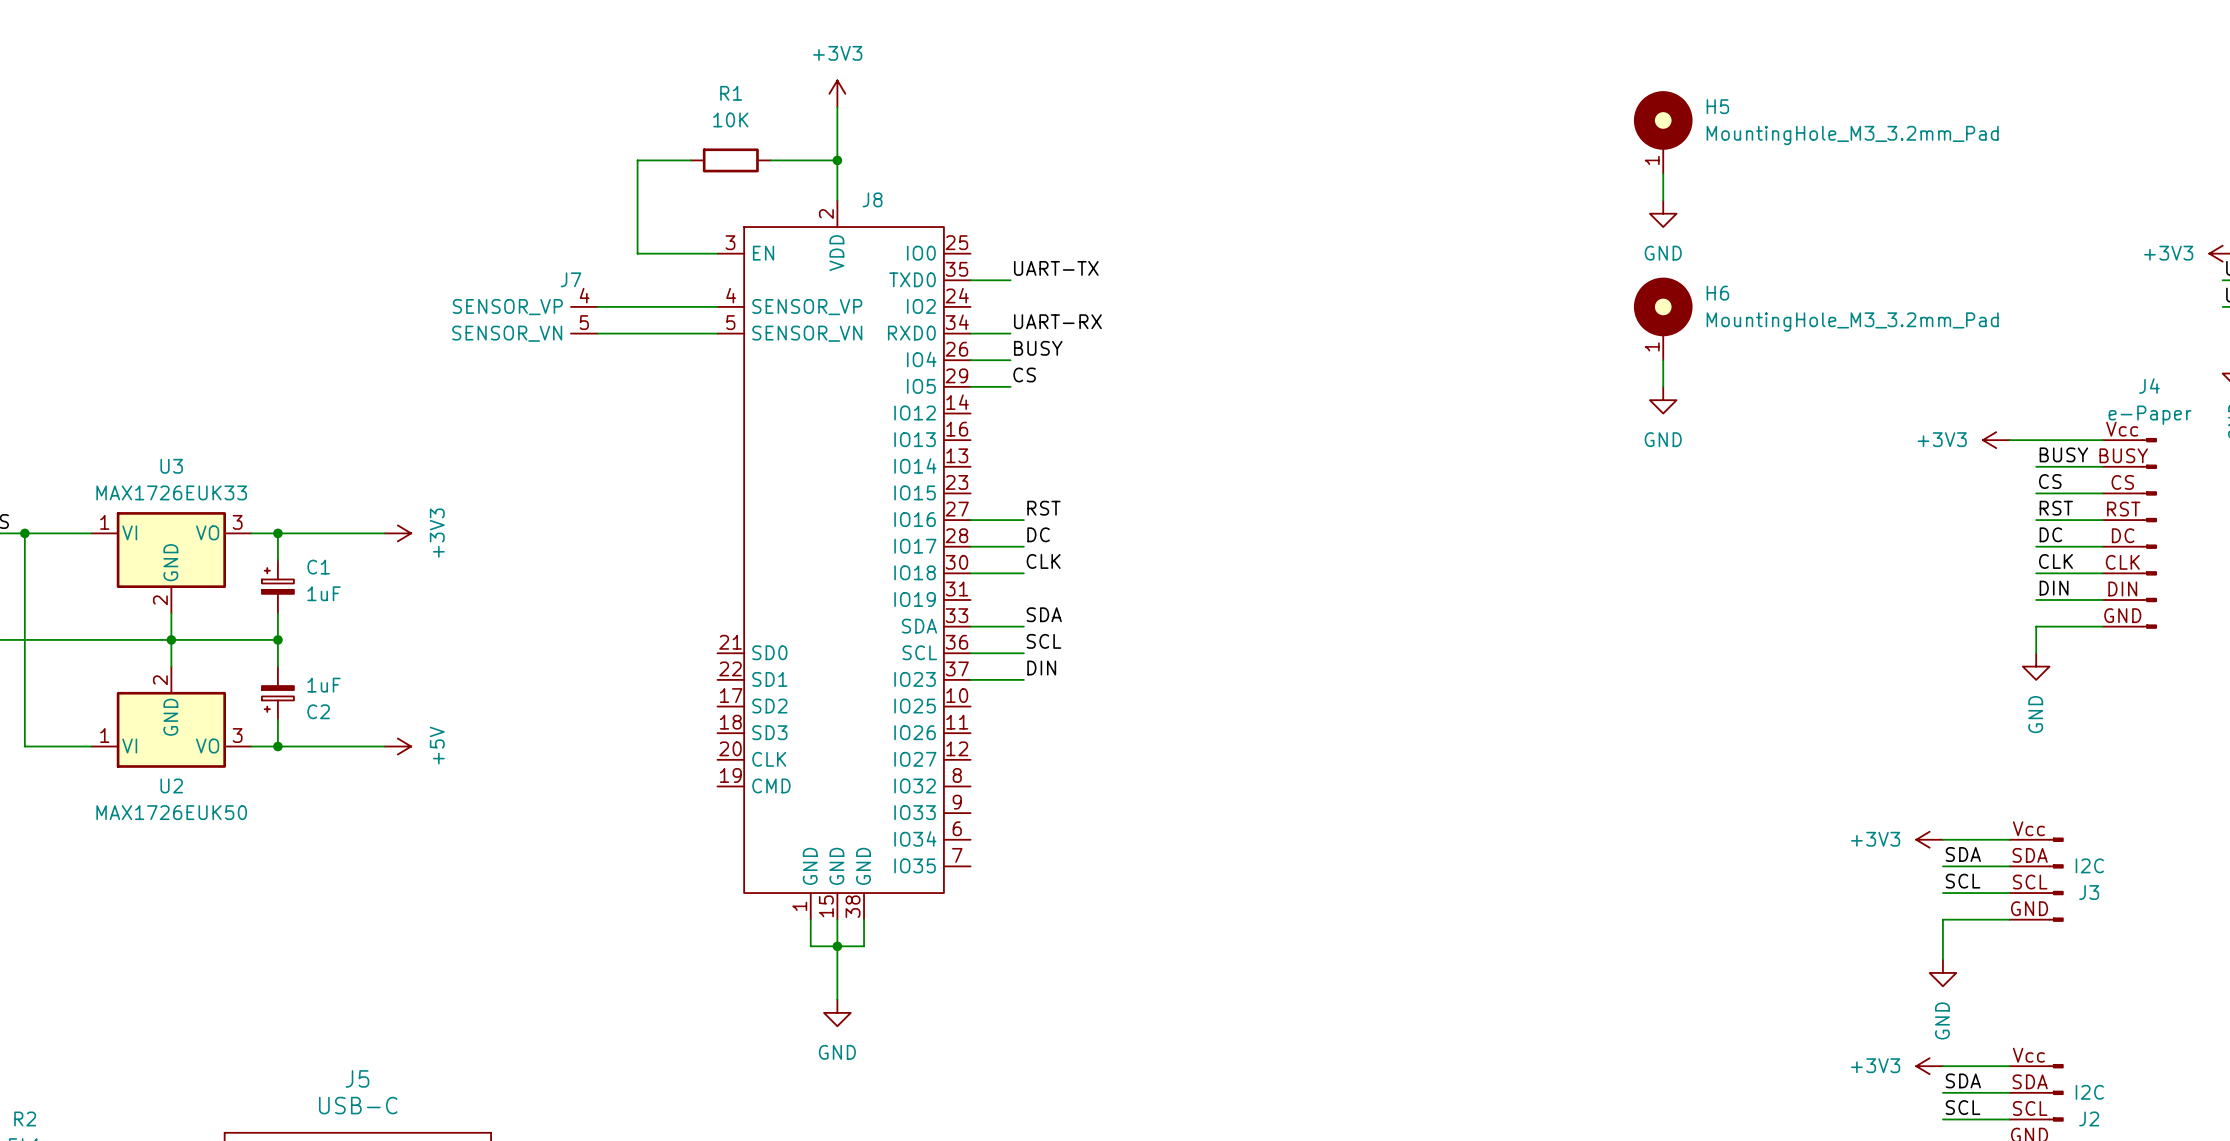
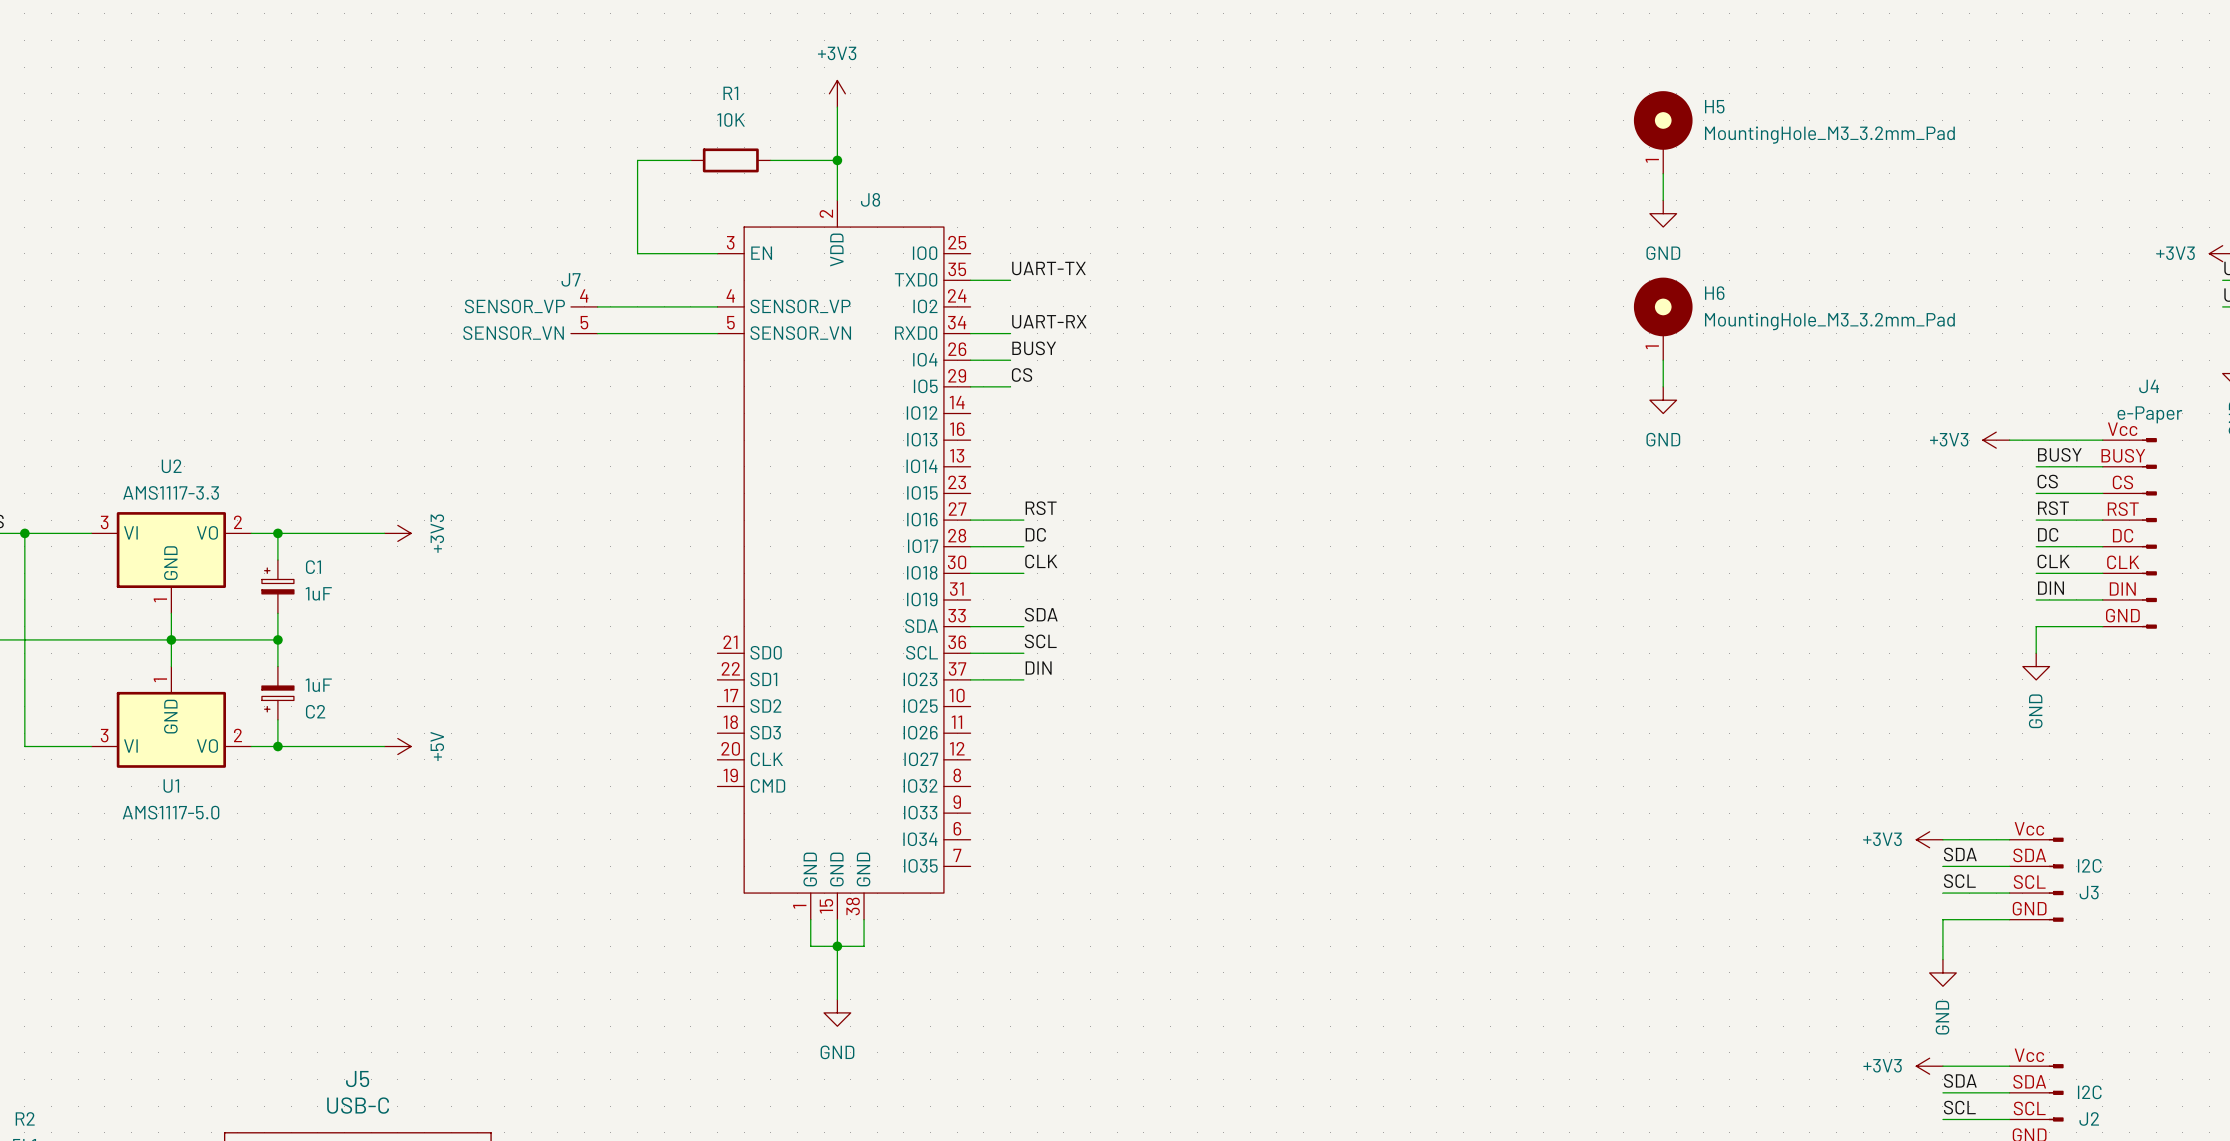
U3: MAX1726EUK33 (171, 562) -> none
U2 symbol: [91, 666, 252, 768] -> [91, 512, 252, 614]
U1: none -> AMS1117-5.0 (171, 717)
U2 name position: U2 (171, 785) -> U2 (171, 466)
U2 value: MAX1726EUK50 (171, 812) -> AMS1117-3.3 (171, 492)

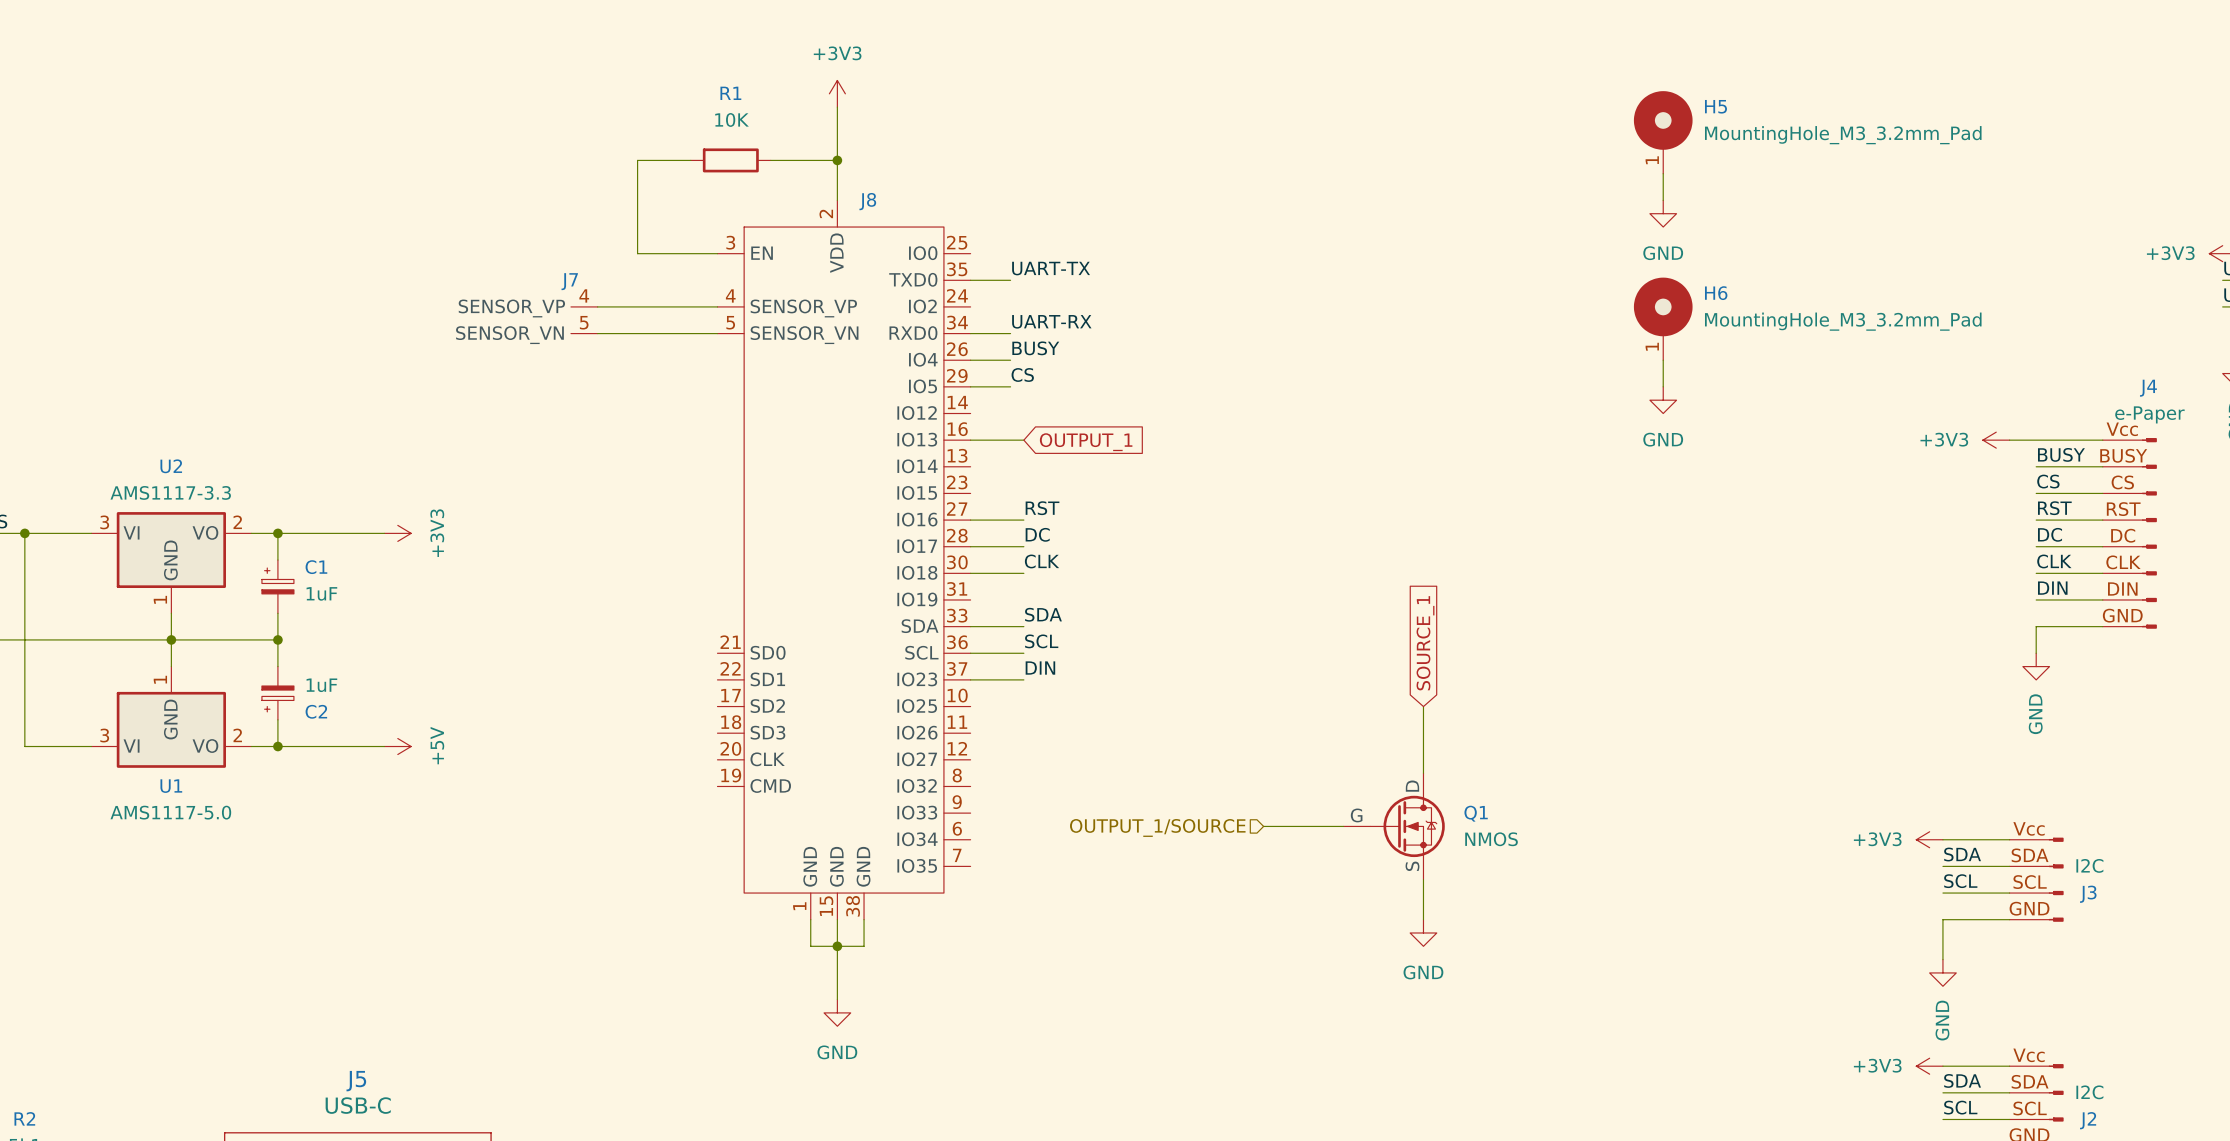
wire: none -> (970, 440) (1023, 440)
global label: none -> OUTPUT_1 (1086, 442)
global label: none -> SOURCE_1 (1425, 643)
wire: none -> (1423, 706) (1423, 773)
hierarchical label: none -> OUTPUT_1/SOURCE (1157, 827)
wire: none -> (1263, 826) (1343, 826)
Q1: none -> NMOS (1394, 826)
wire: none -> (1423, 879) (1423, 919)
power symbol: none -> GND (1423, 932)

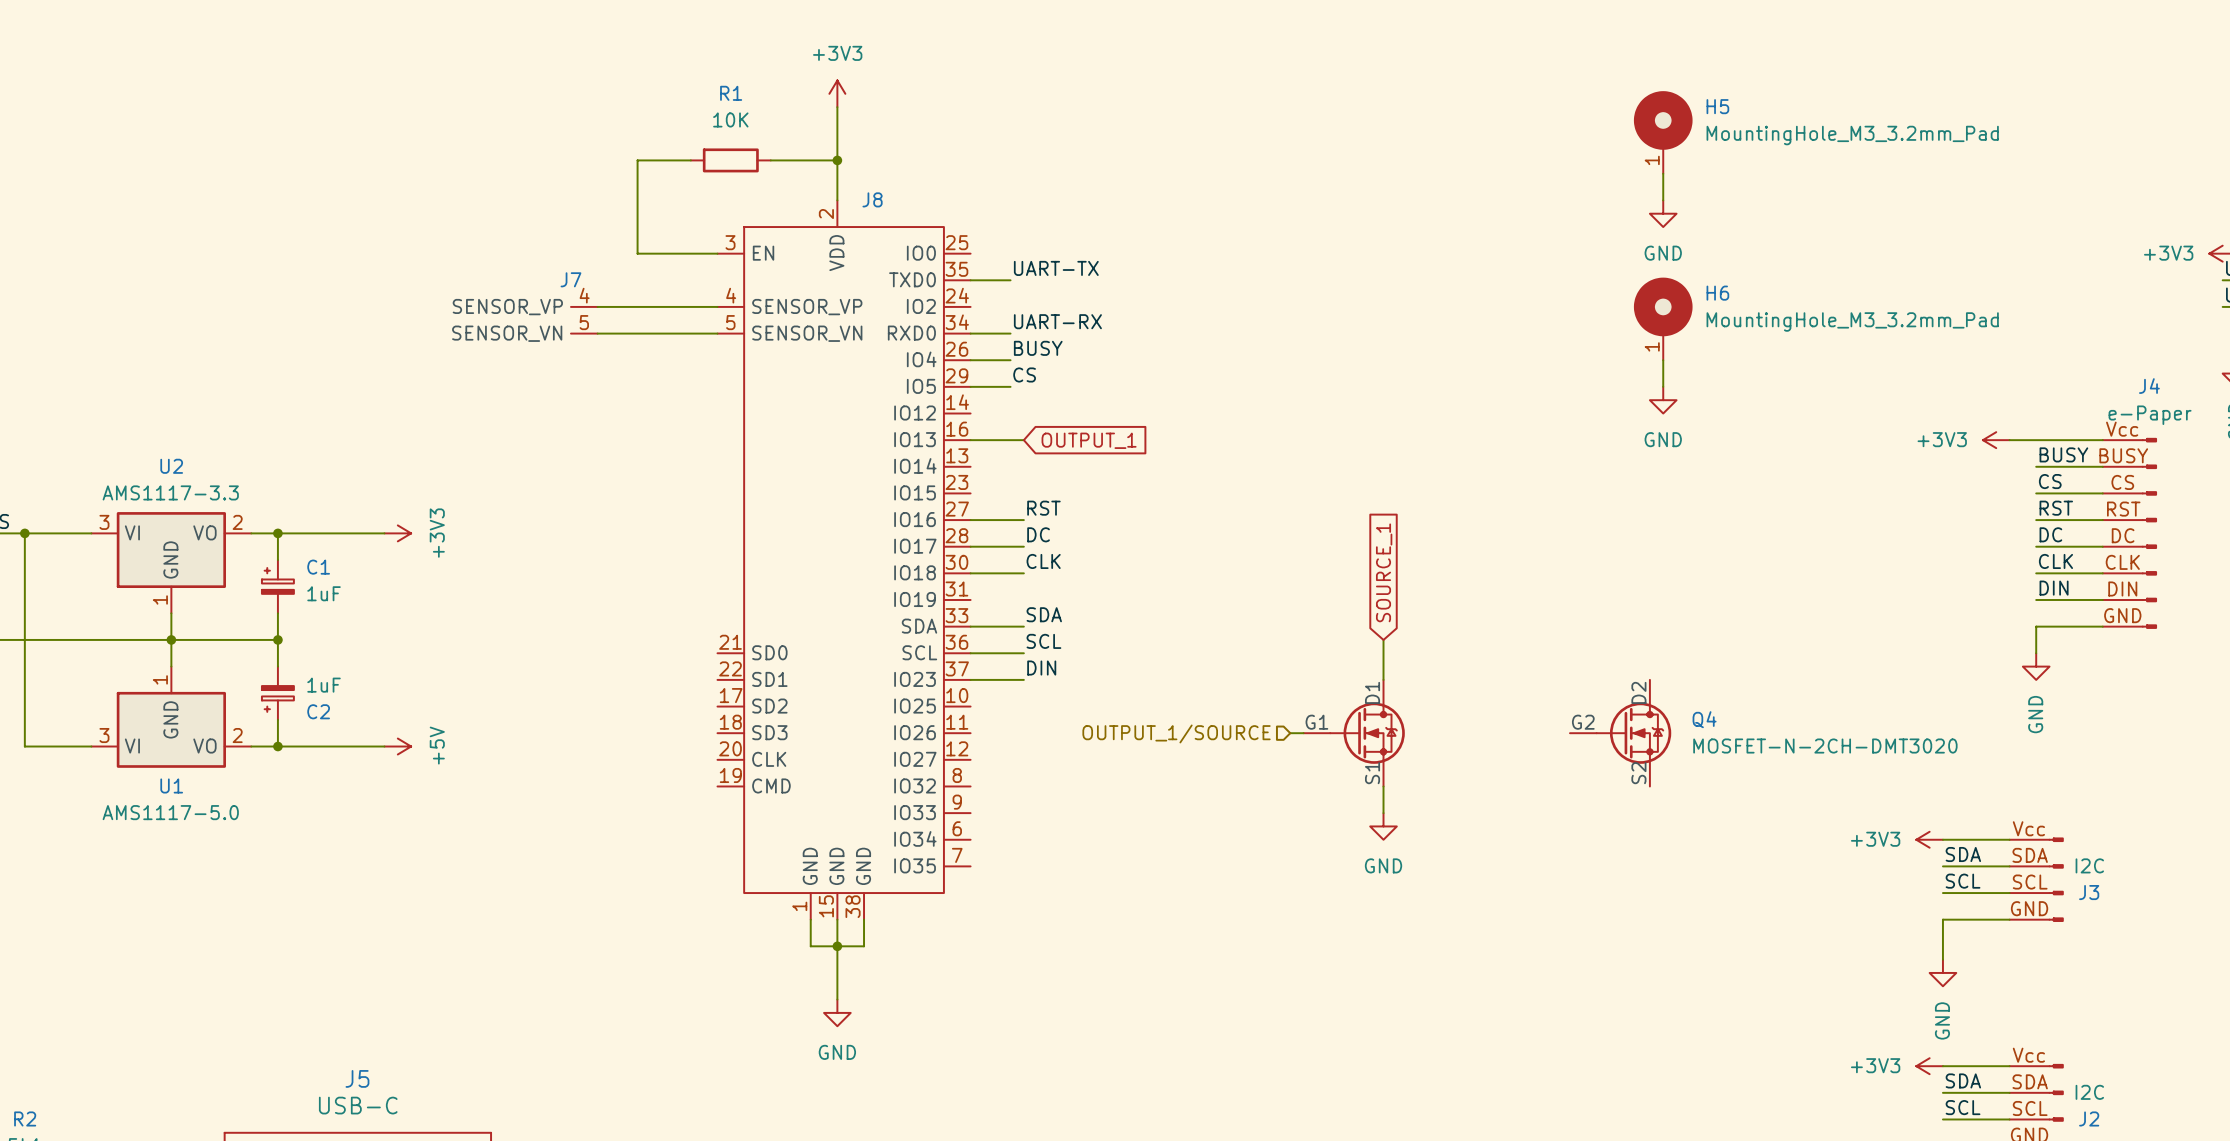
global label position: SOURCE_1 (1425, 643) -> SOURCE_1 (1384, 572)
wire: (1423, 706) (1423, 773) -> none
wire: none -> (1290, 733) (1303, 733)
Q4: none -> MOSFET-N-2CH-DMT3020 (1487, 733)
wire: none -> (1383, 786) (1383, 813)
wire: (1263, 826) (1343, 826) -> none
Q1: NMOS (1394, 826) -> none
hierarchical label position: OUTPUT_1/SOURCE (1157, 827) -> OUTPUT_1/SOURCE (1176, 733)
wire: (1423, 879) (1423, 919) -> (1383, 639) (1383, 679)
power symbol position: GND (1423, 932) -> GND (1383, 826)

